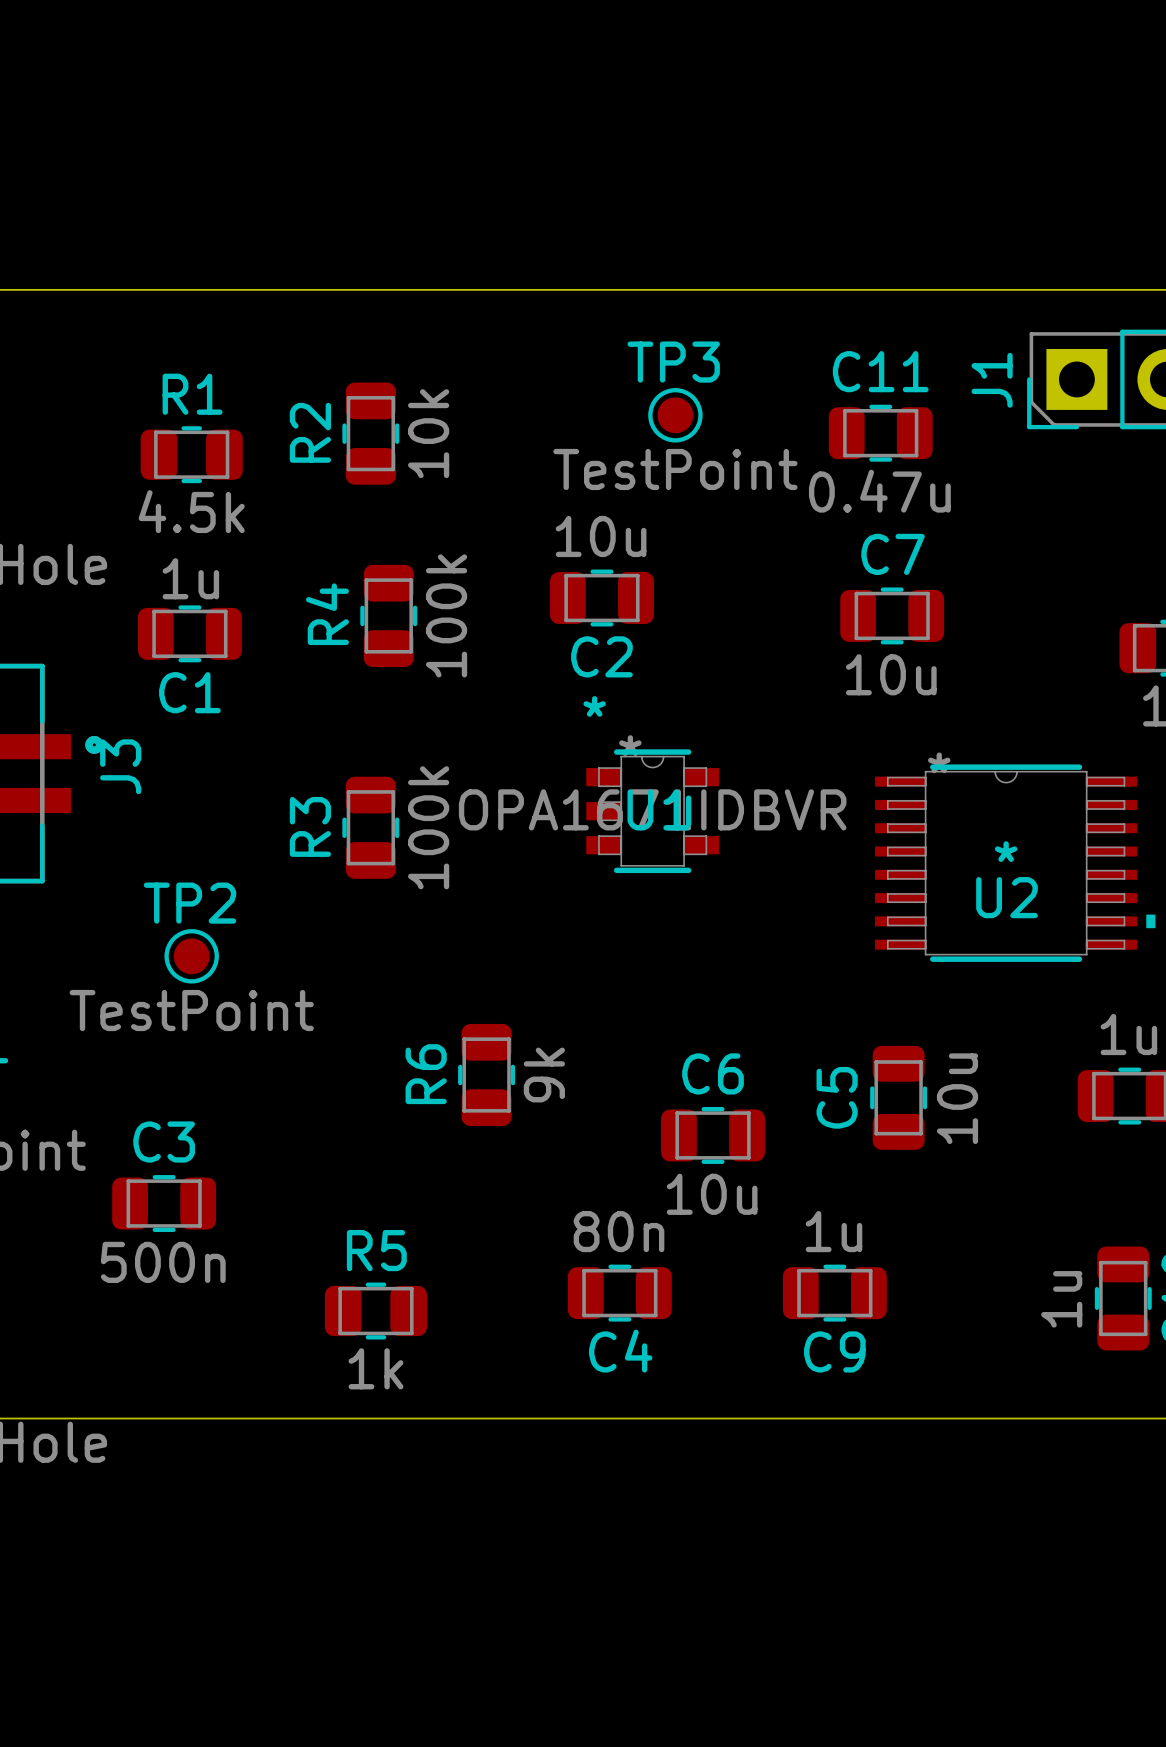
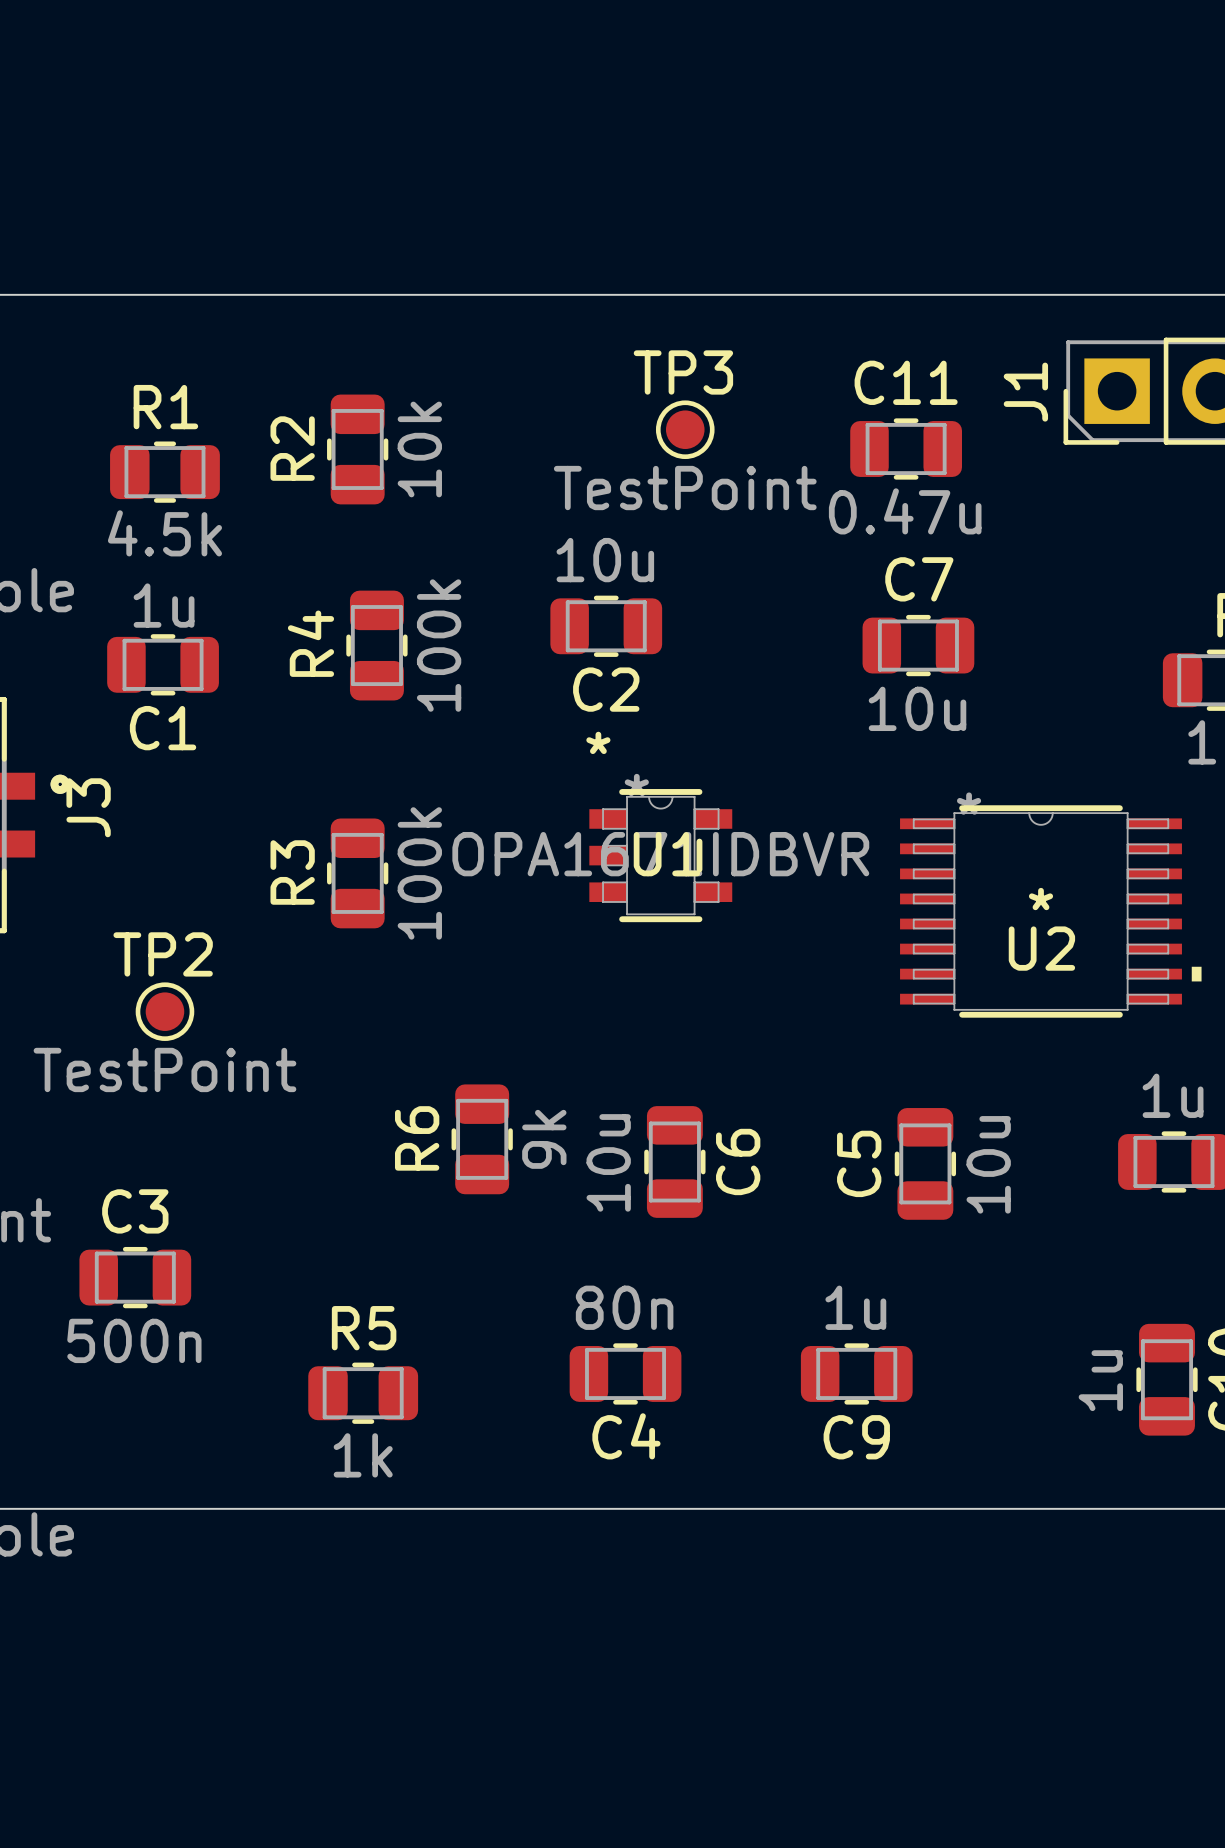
C6 rotation: 0° (713, 1135) -> 90° clockwise (674, 1161)

